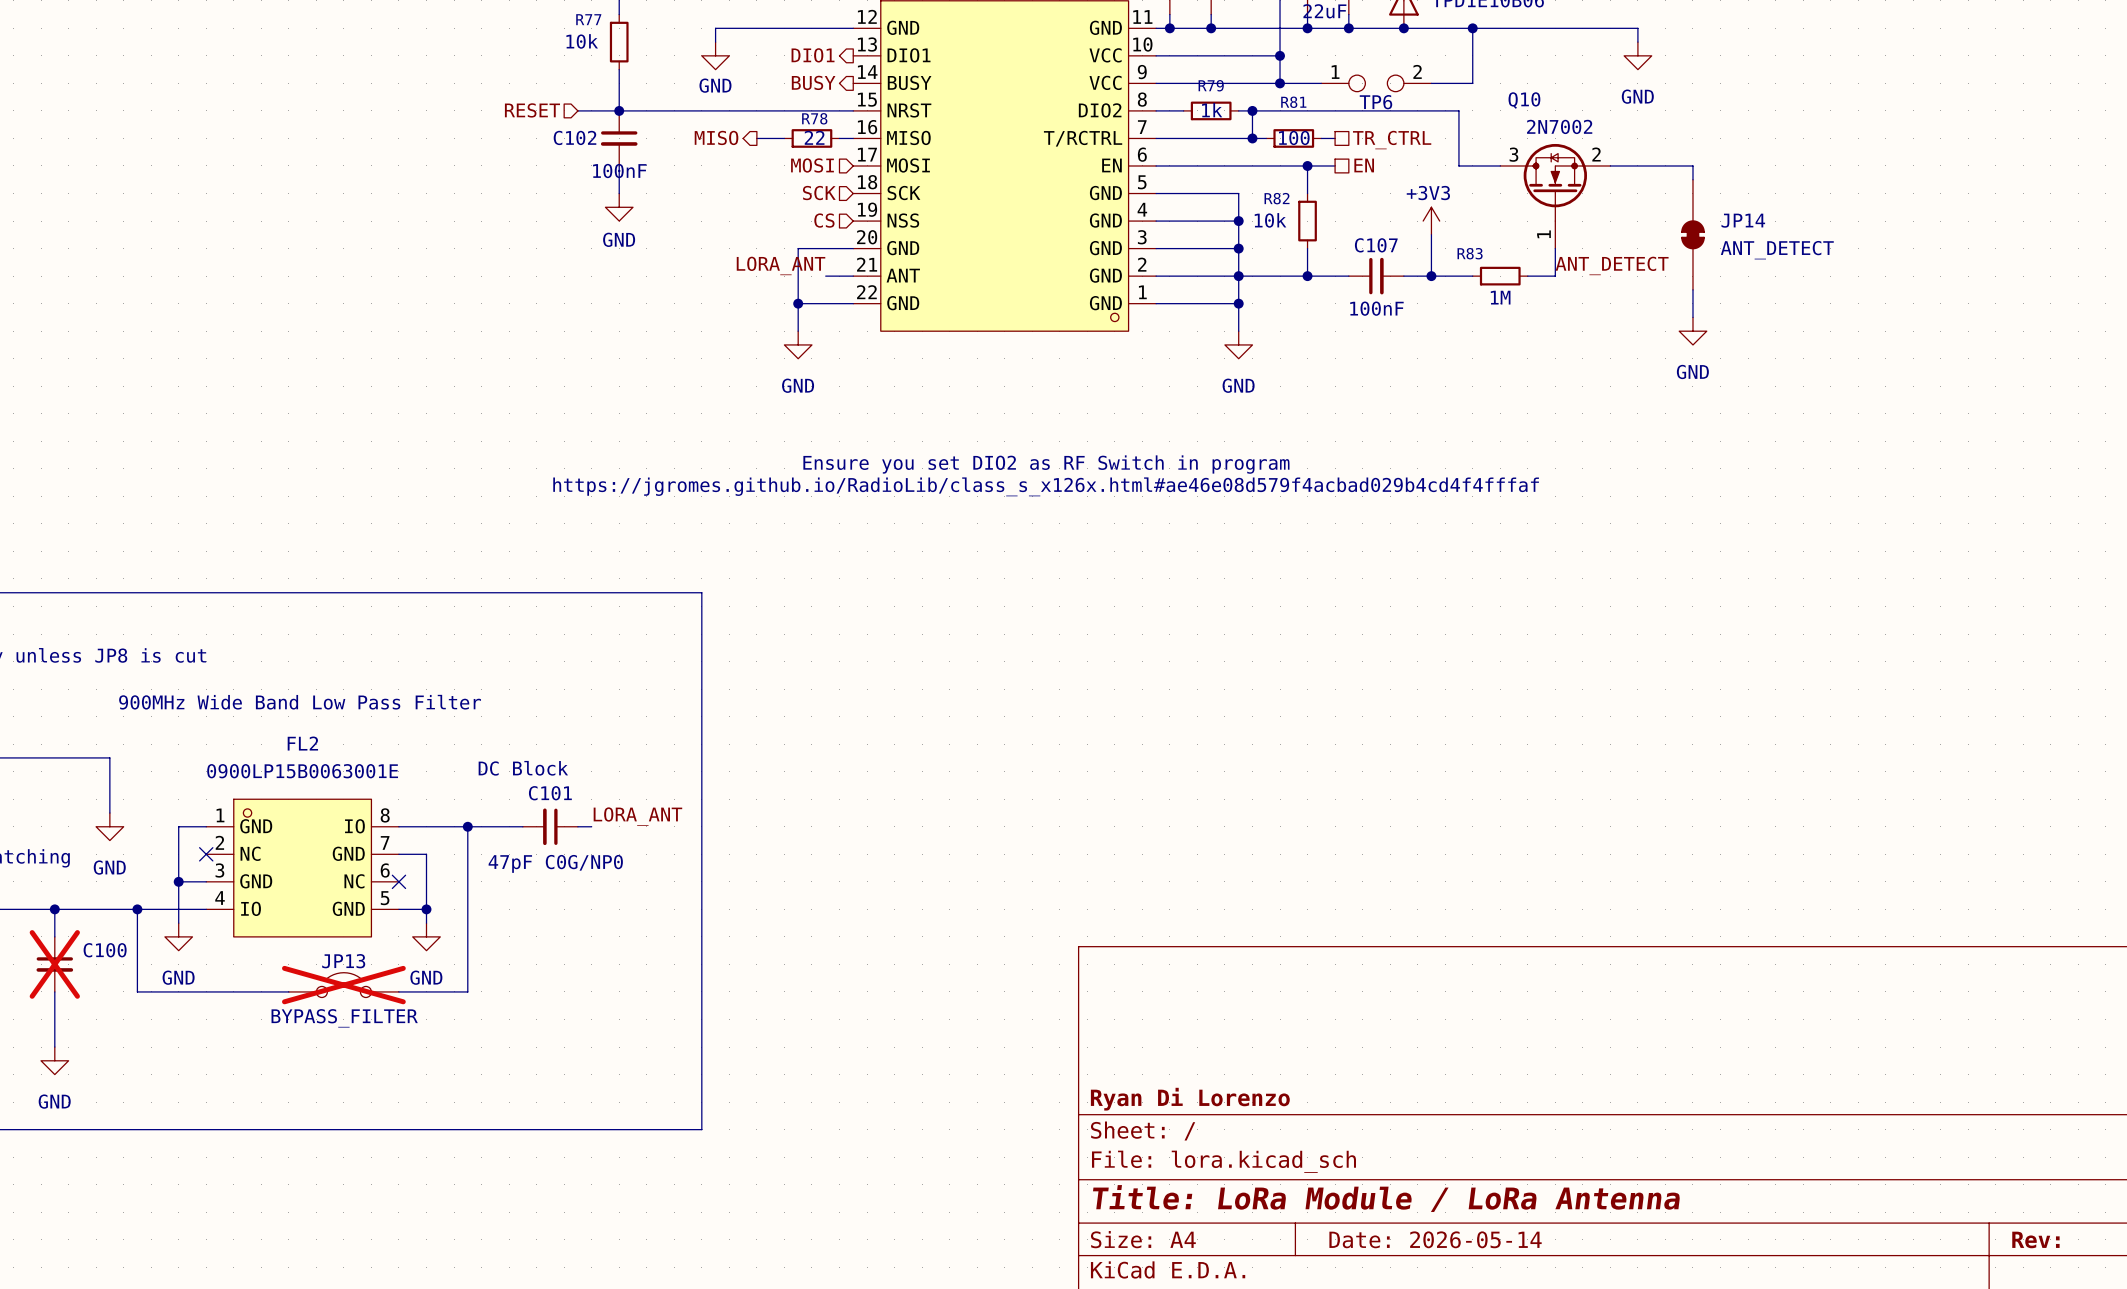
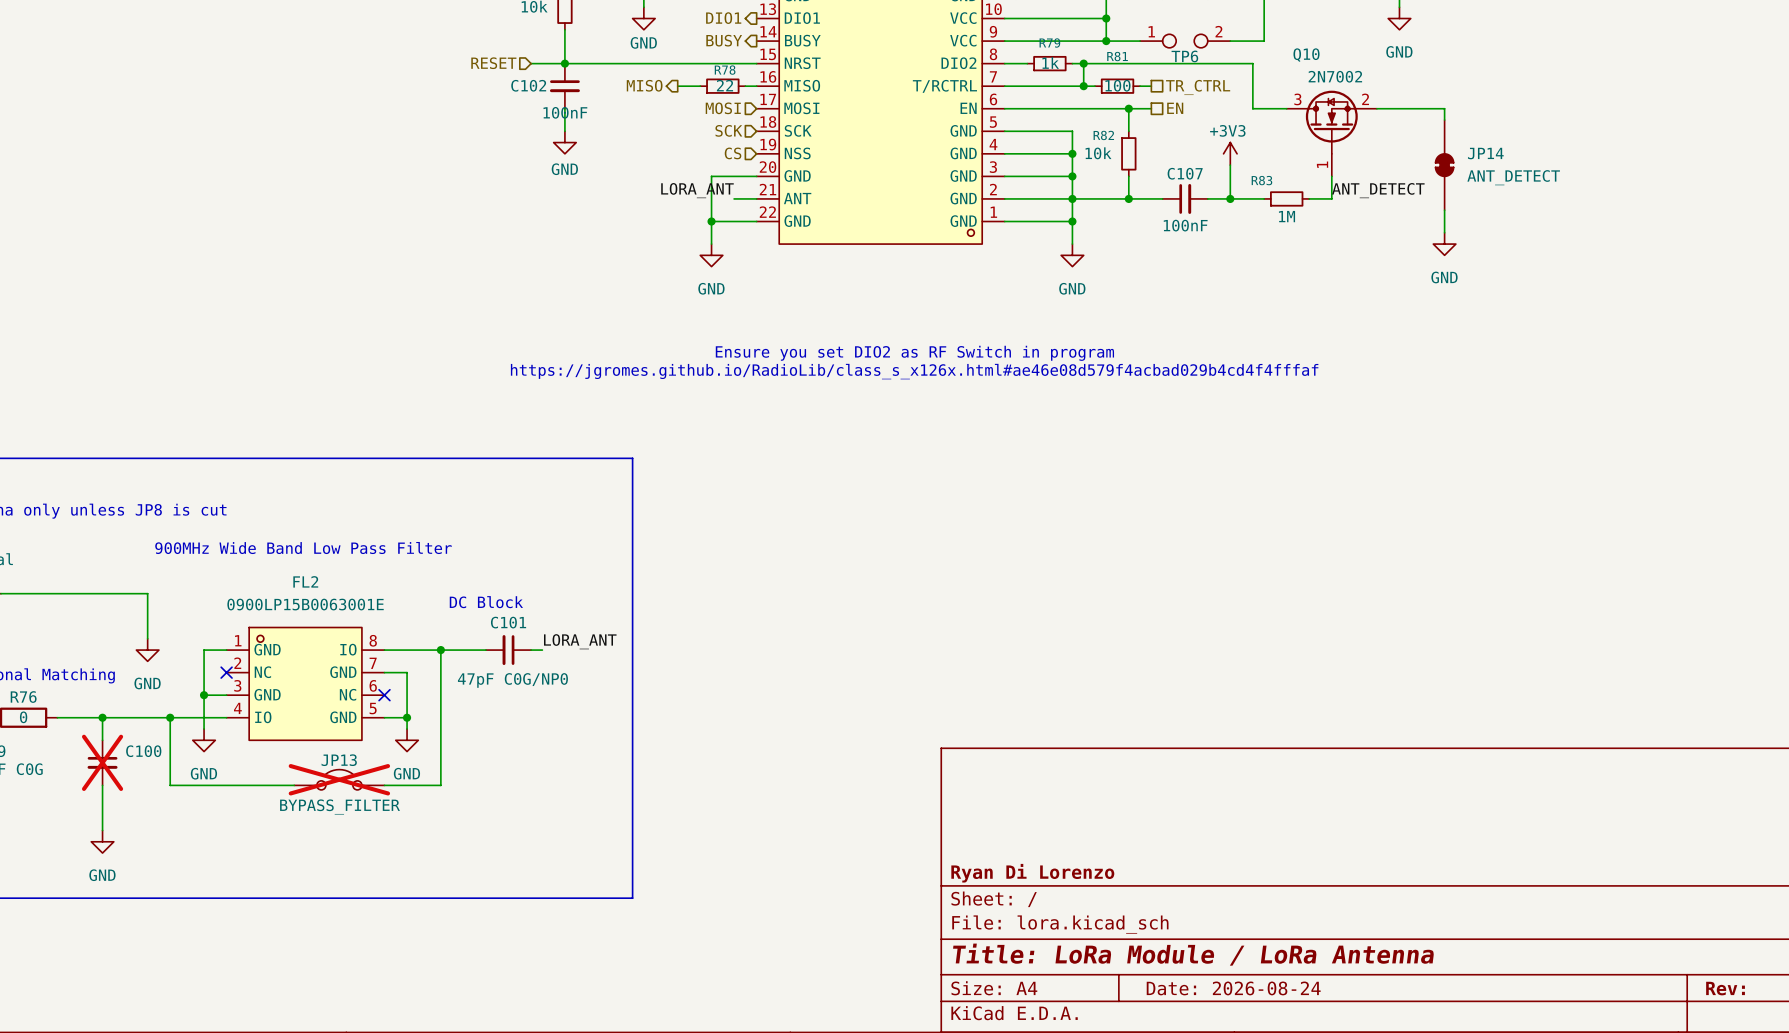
title block: Date: 2026-05-14 (1435, 1239) -> Date: 2026-08-24 (1233, 988)

